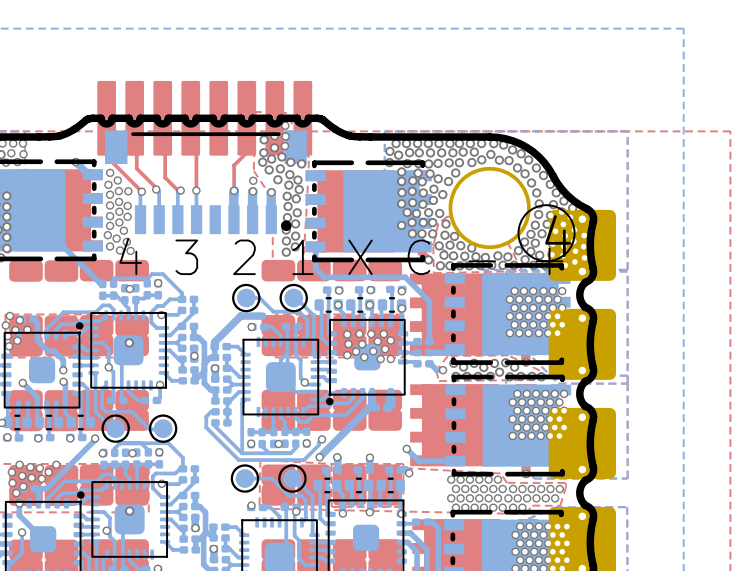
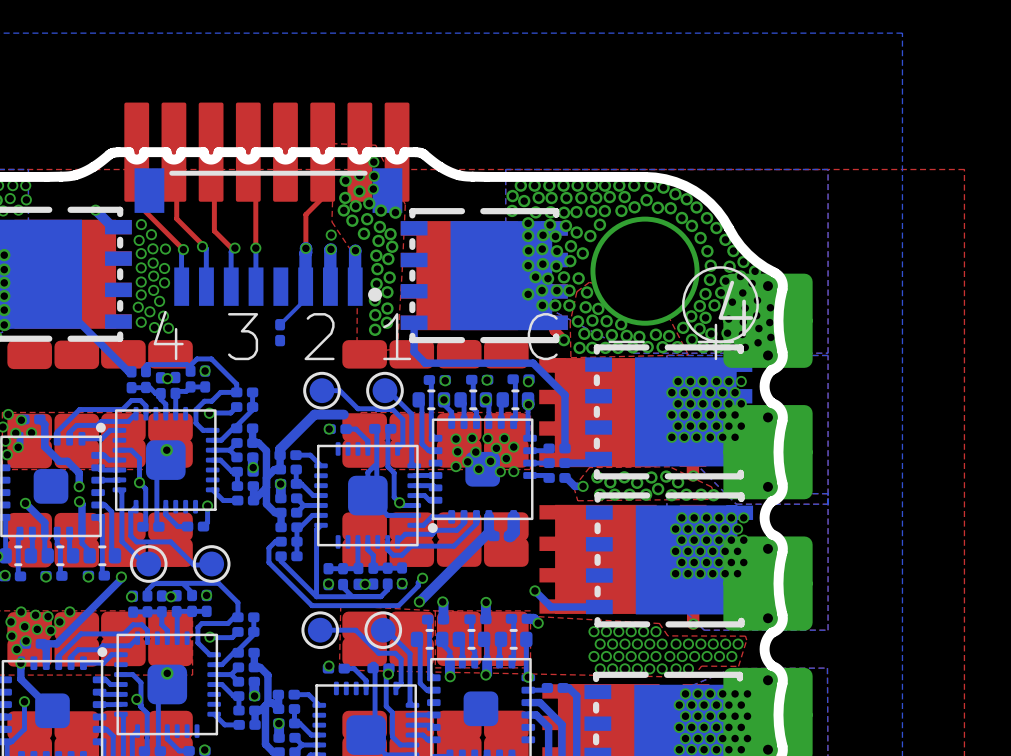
bottom track: none -> (305, 286) (305, 299) (280, 324)
part: none -> (280, 332)
text: 4 3 2 1 X C - + (341, 256) -> 4 3 2 1 C - + (443, 335)

